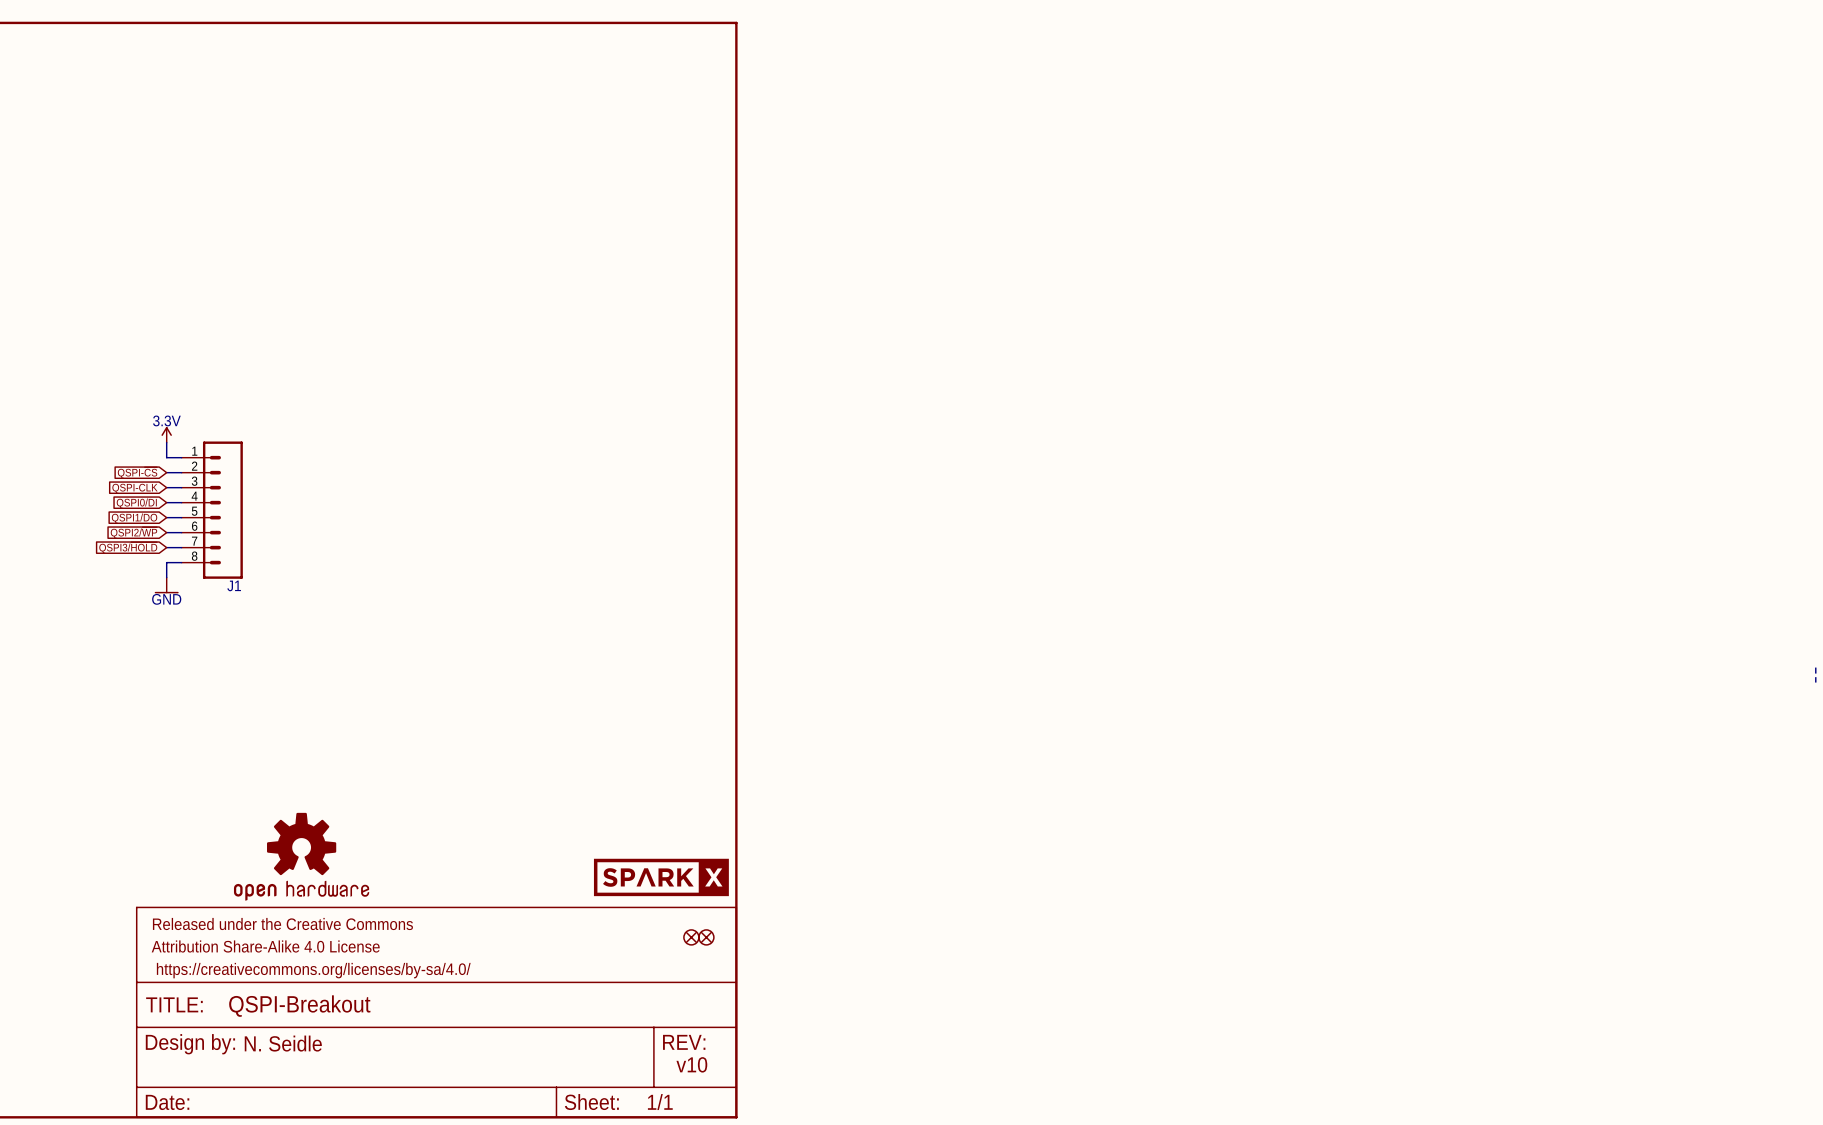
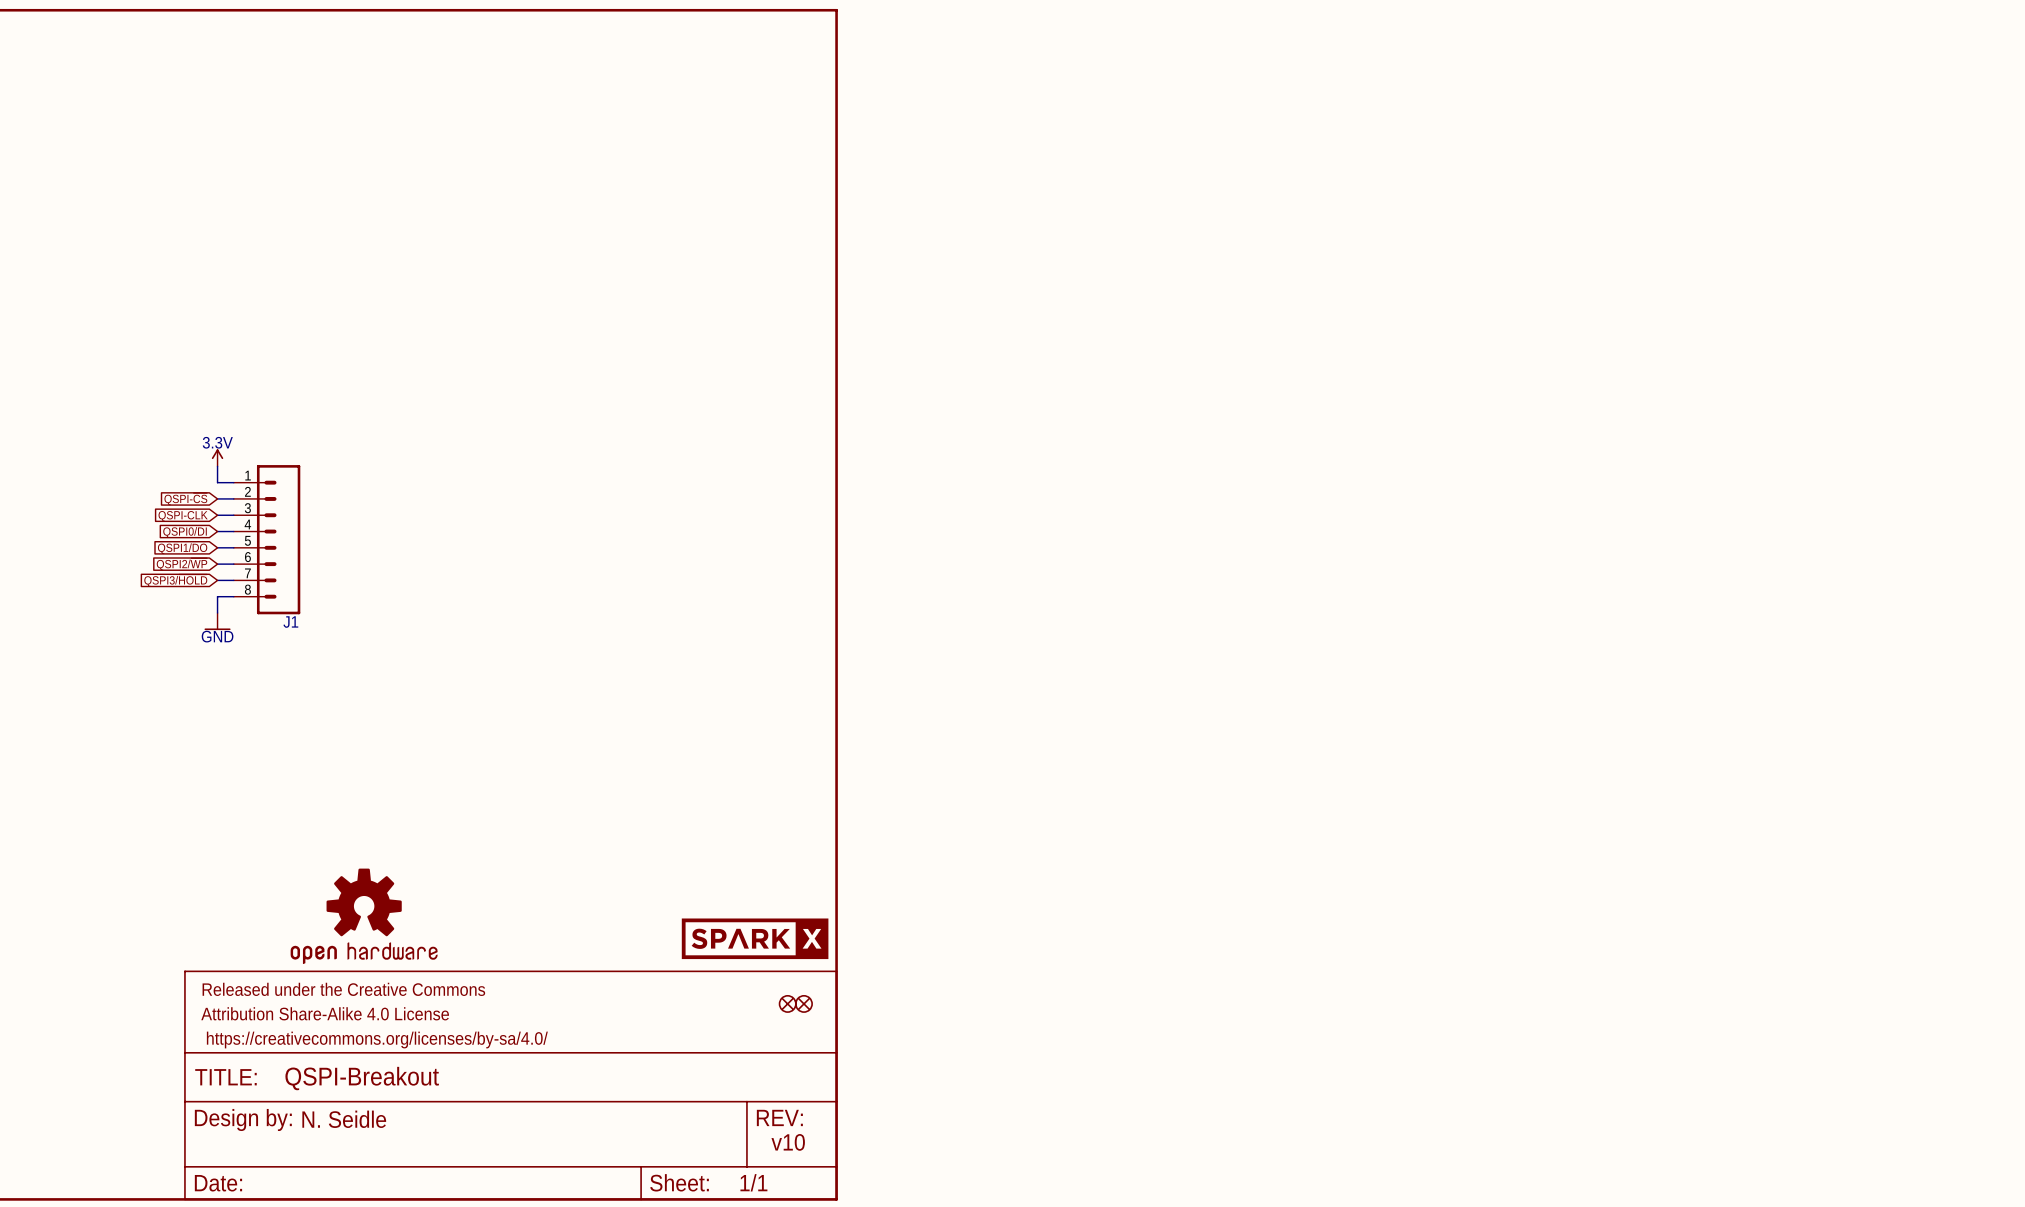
line: (1815, 667) (1815, 682) -> none

